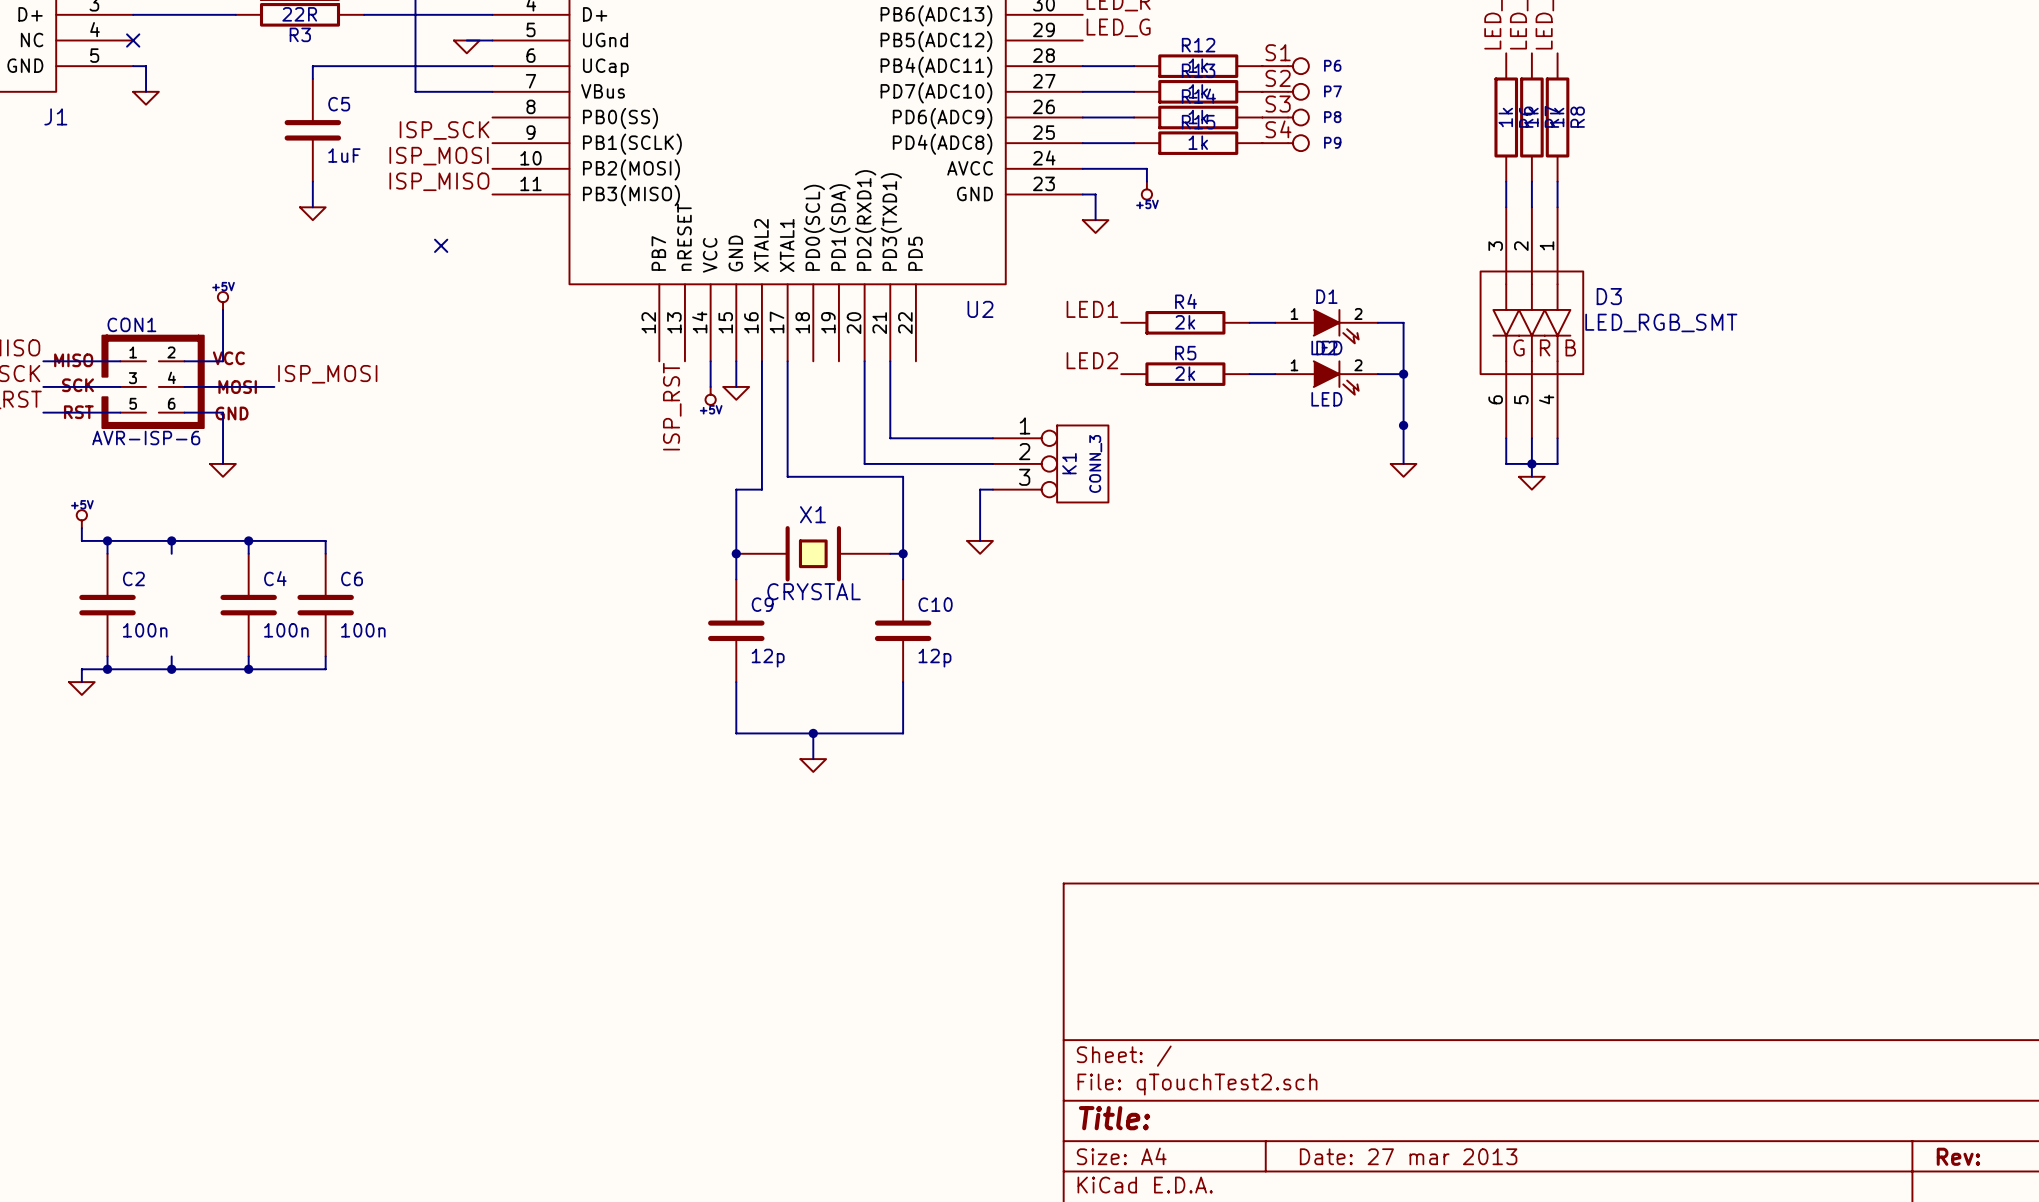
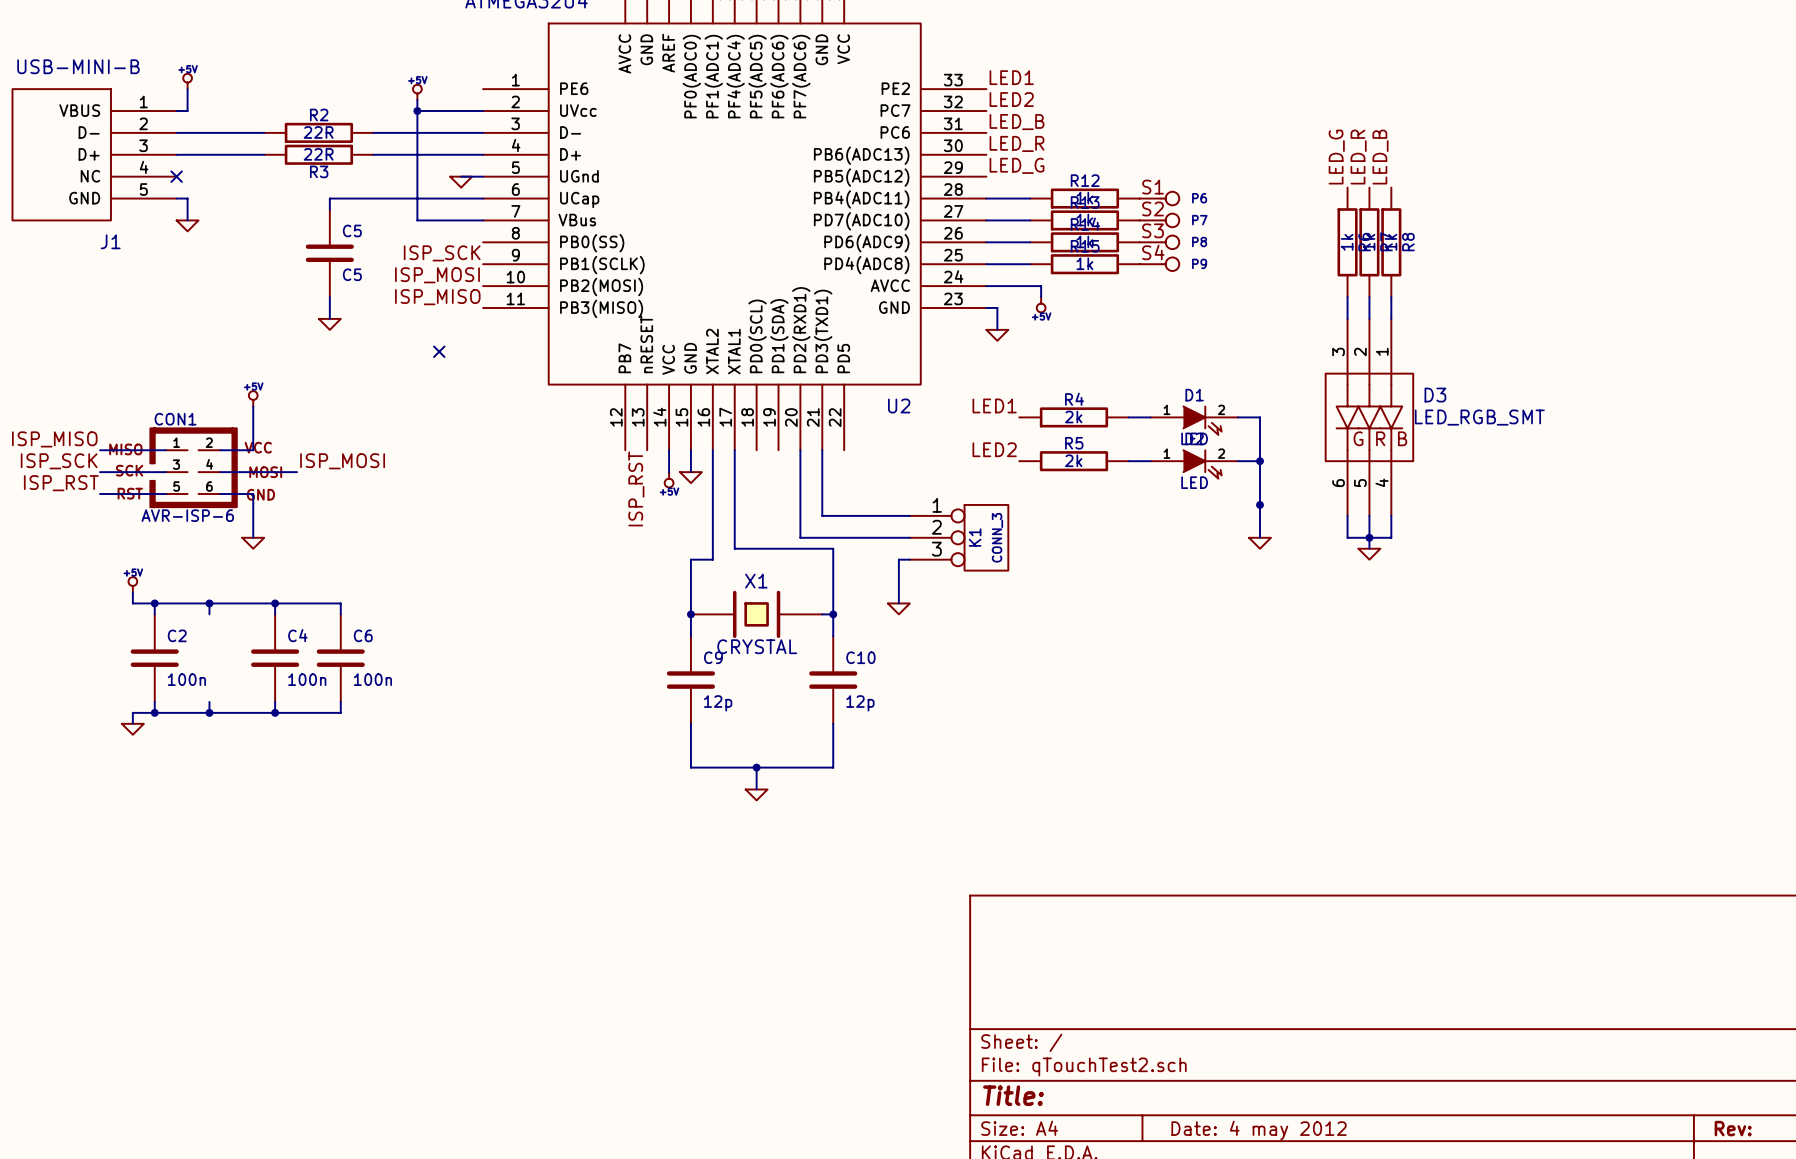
C5 value: 1uF (344, 155) -> C5 (352, 274)
title block: Date: 27 mar 2013 (1408, 1156) -> Date: 4 may 2012 (1259, 1130)

